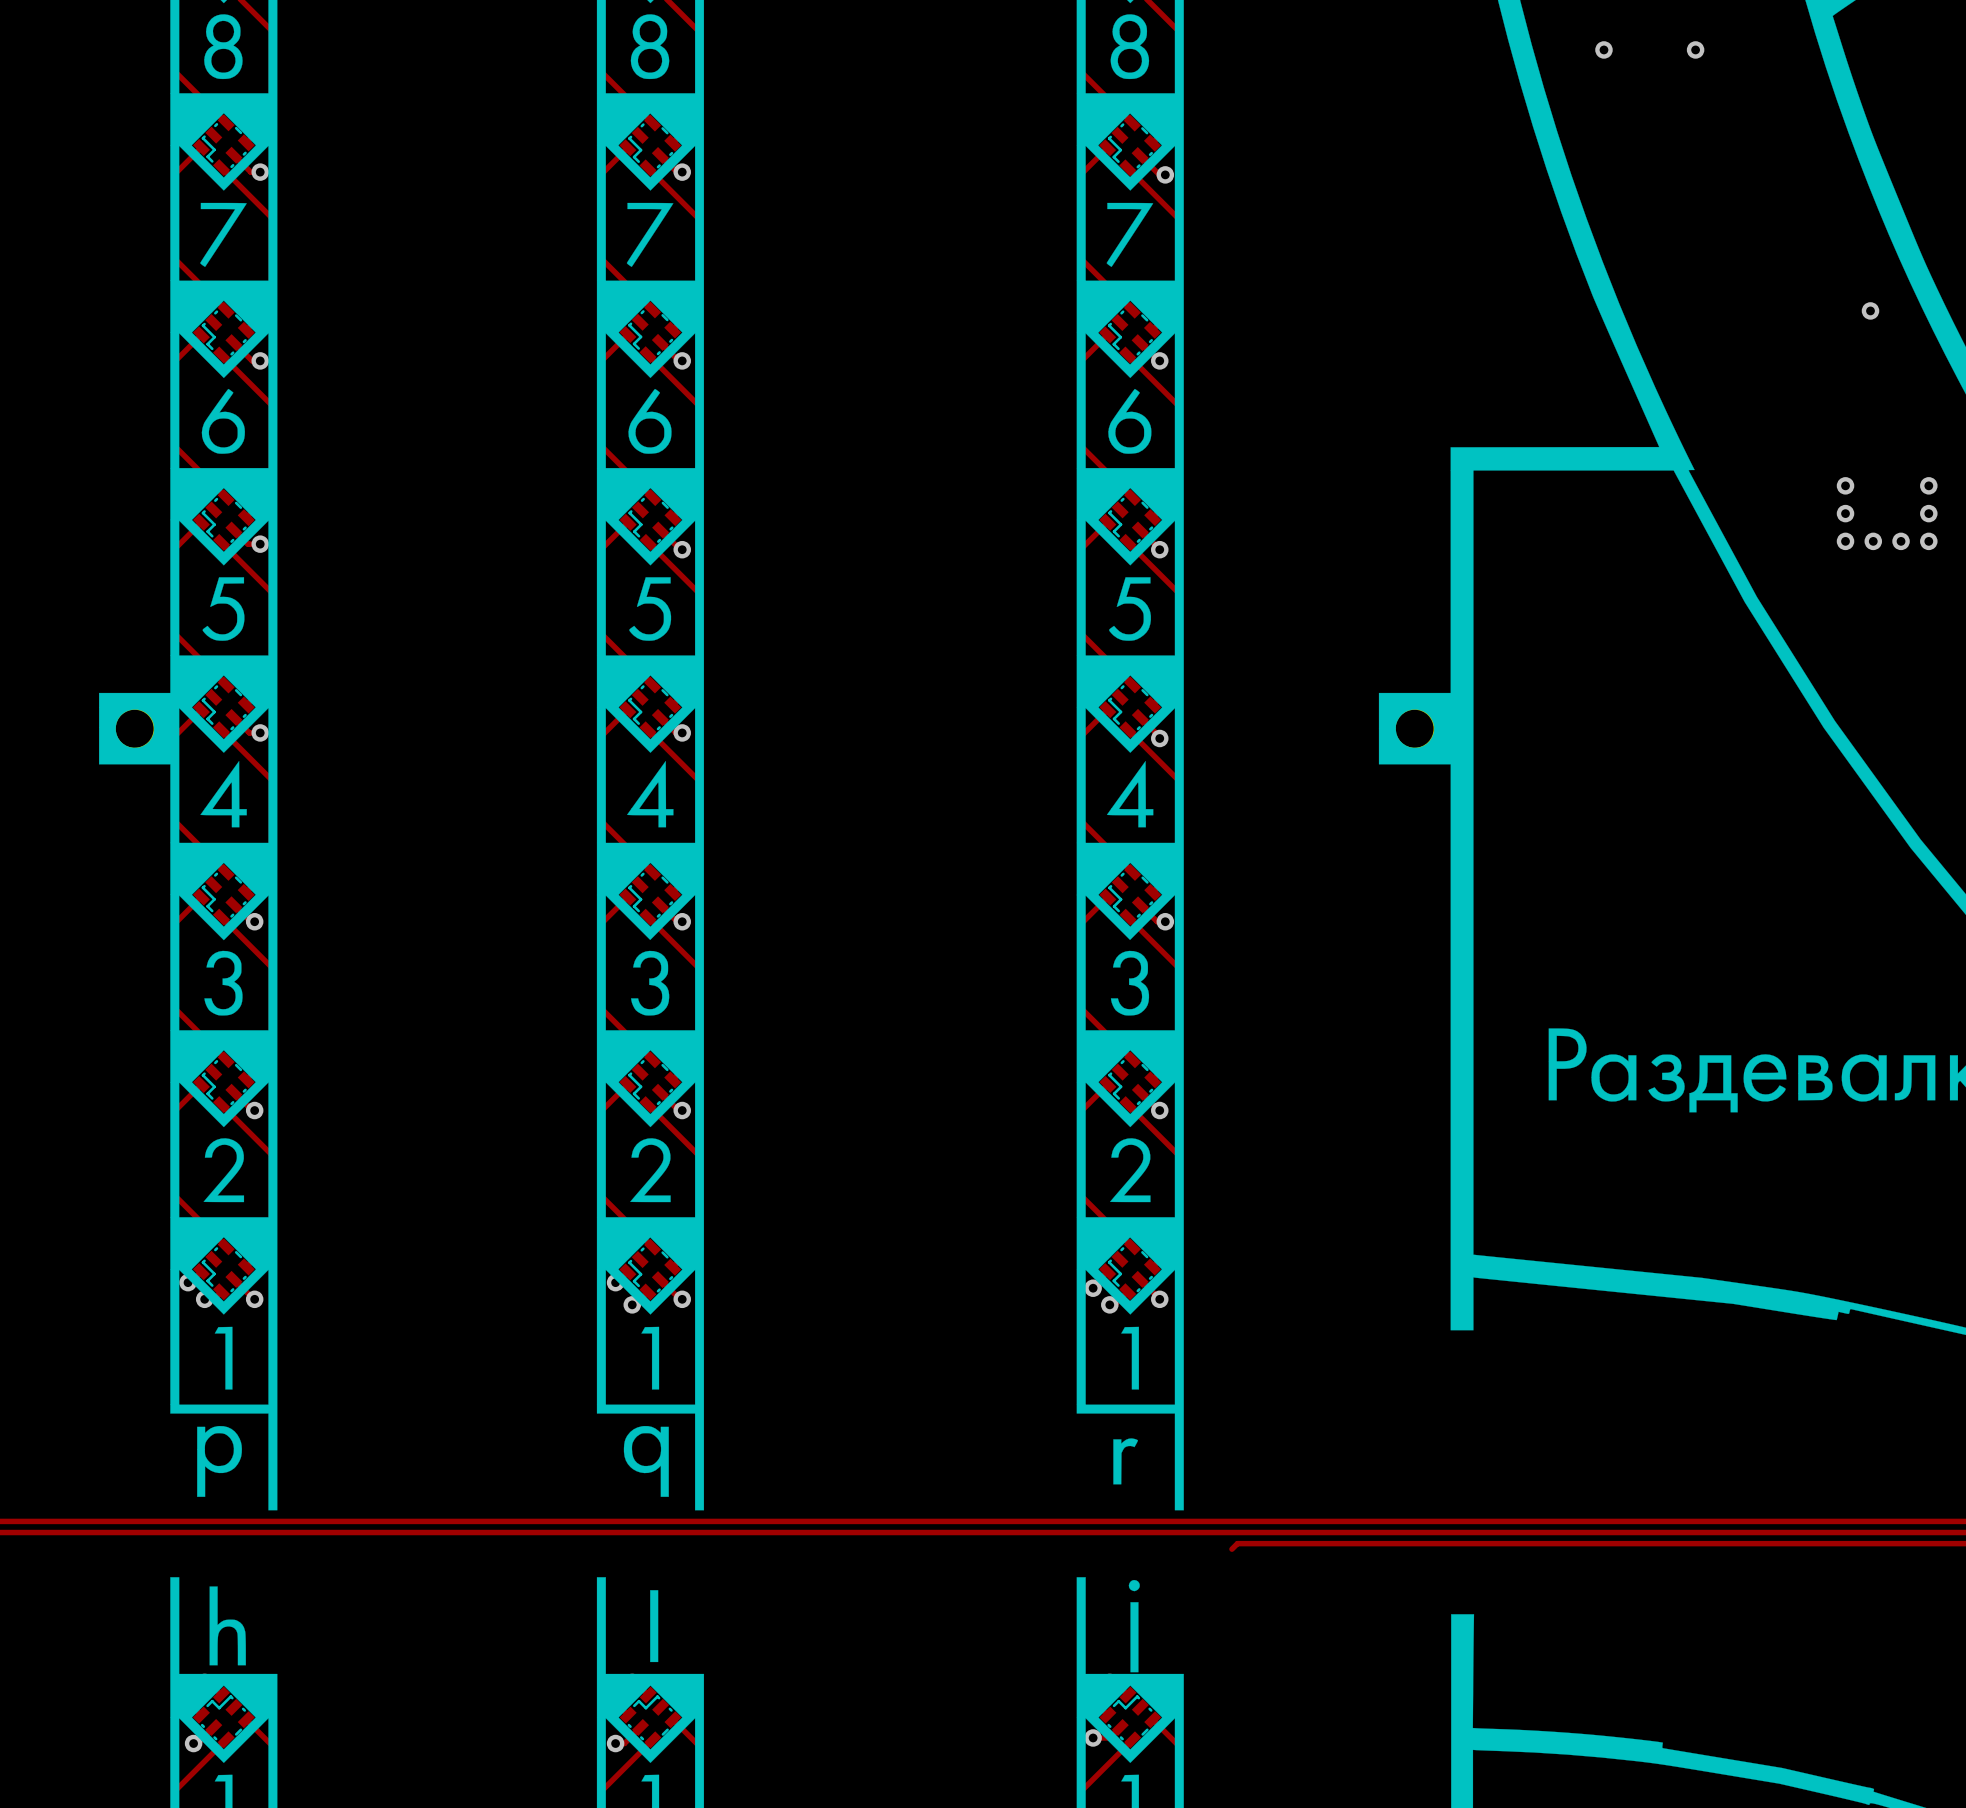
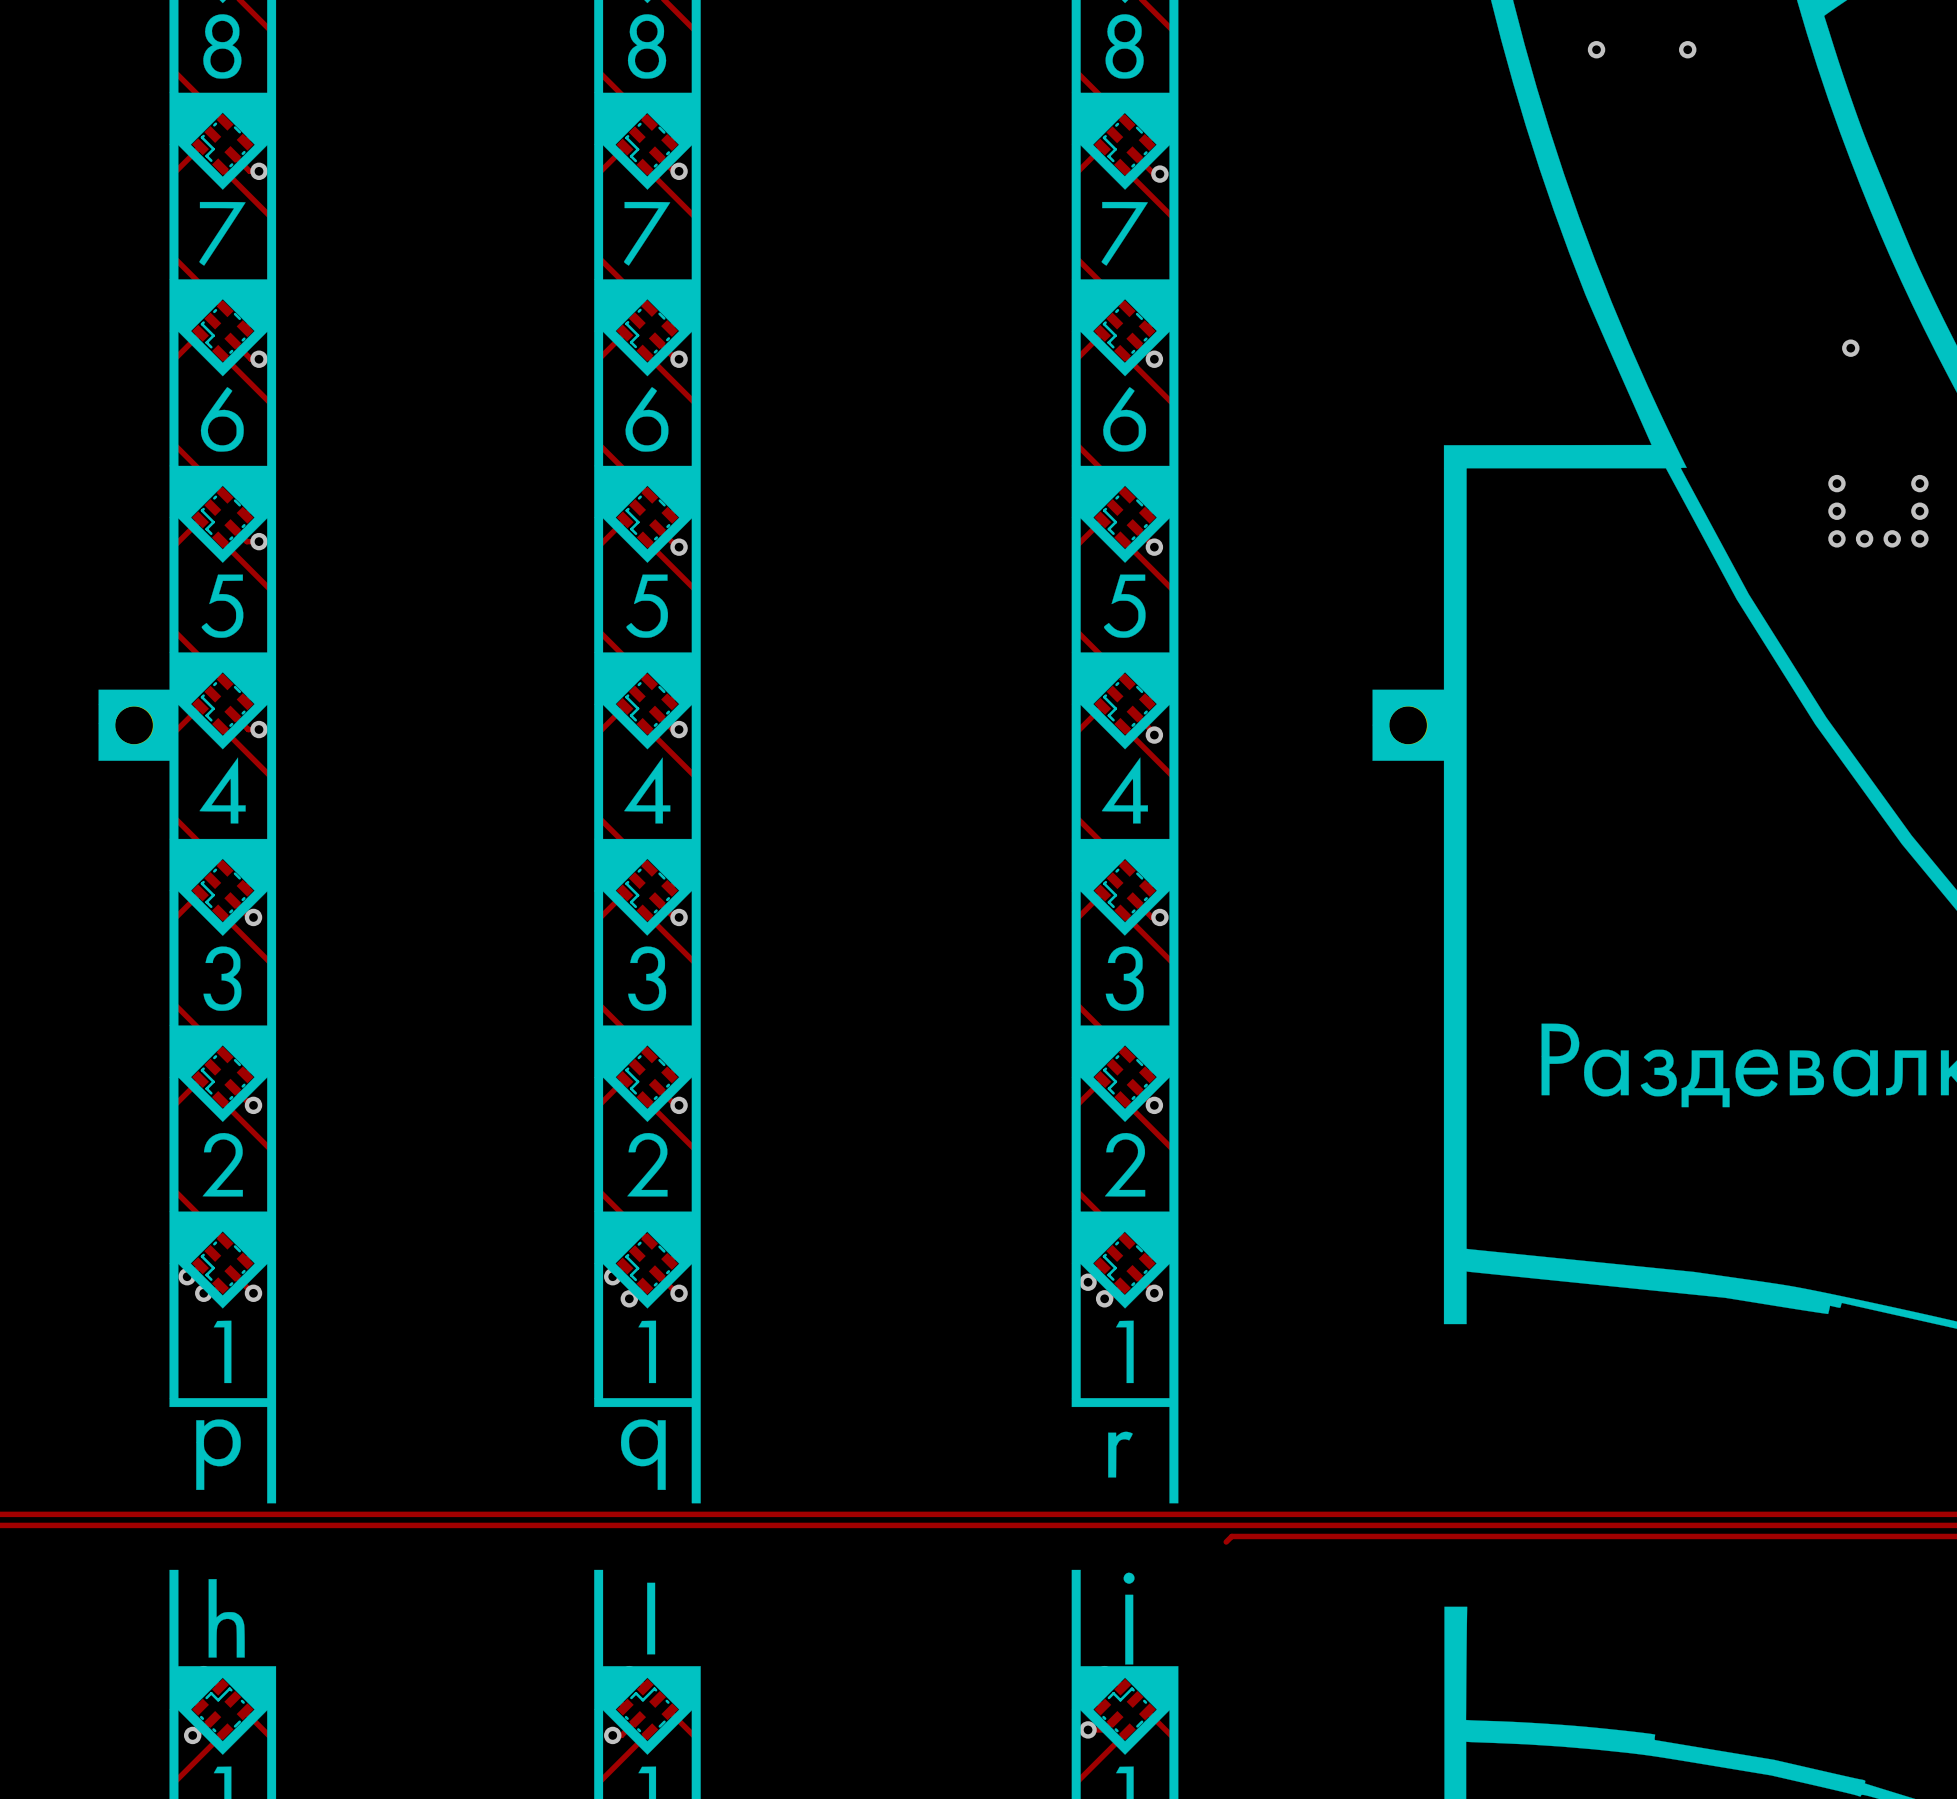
via position: (1870, 310) -> (1850, 348)

